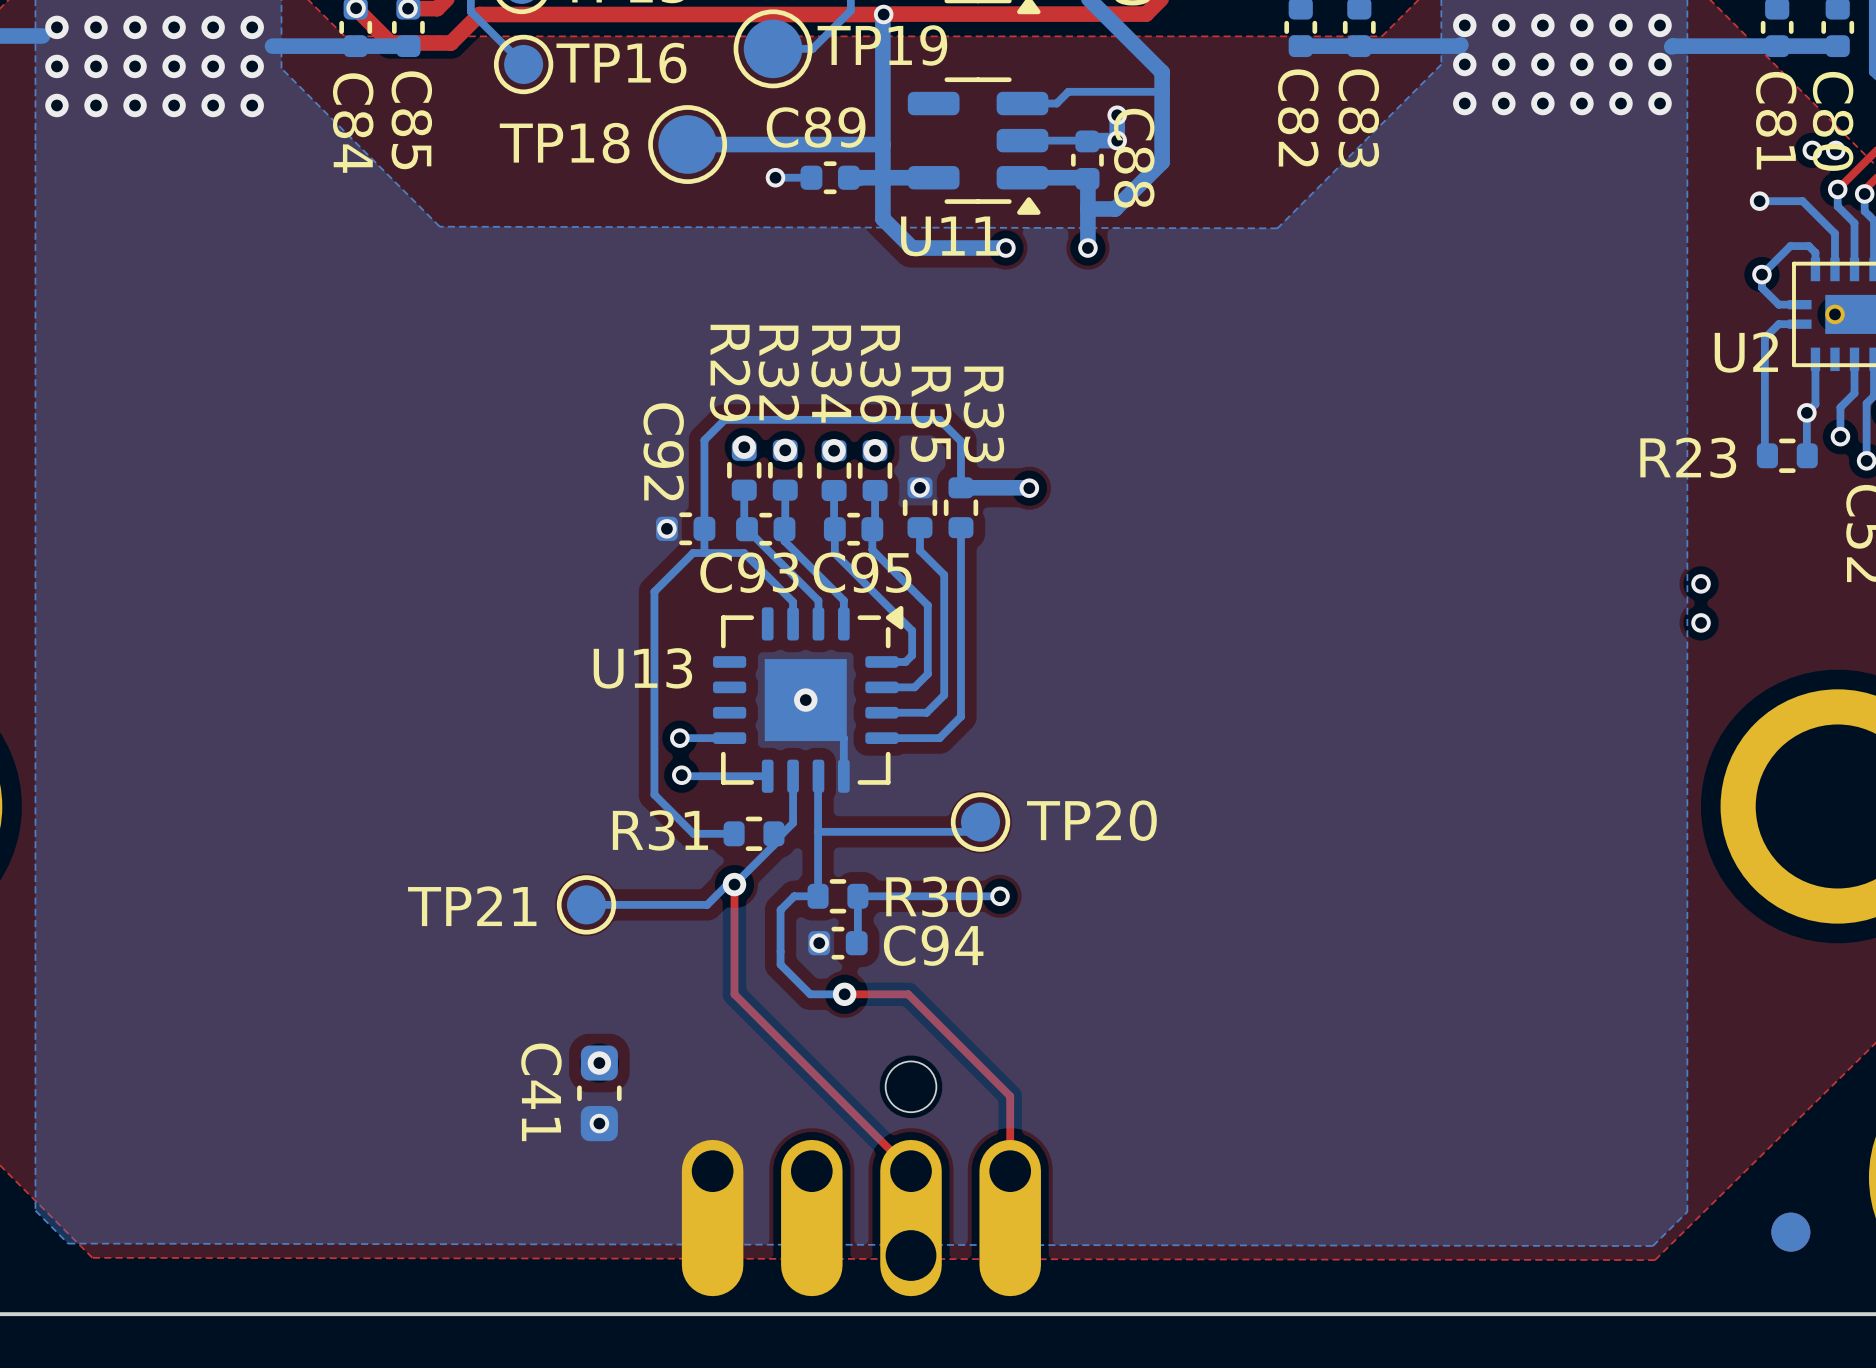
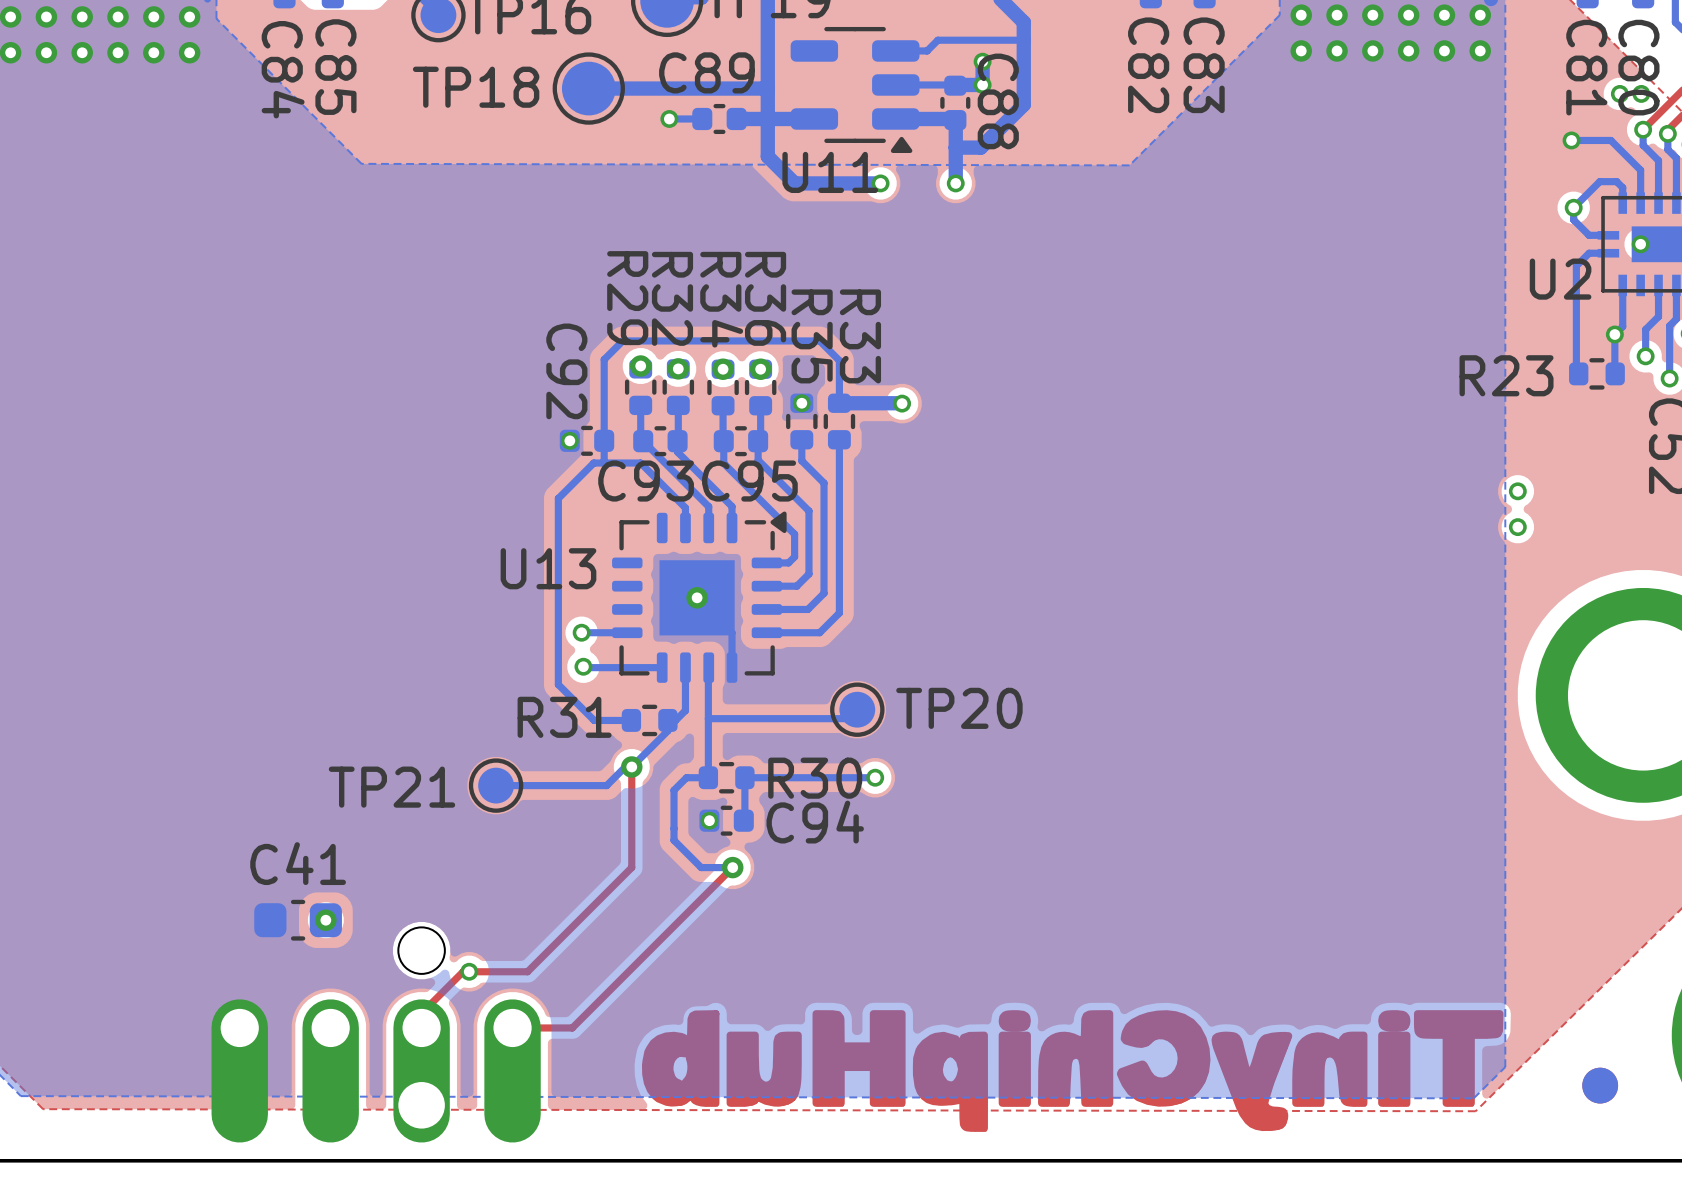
top track: (734, 994) (911, 1170) -> (631, 867) (527, 971) (463, 971) (421, 1013) (421, 1027)
top track: (844, 994) (908, 994) (1010, 1096) (1010, 1171) -> (732, 867) (572, 1027) (512, 1027)
via position: (599, 1063) -> (325, 920)
C41 rotation: 0° (599, 1093) -> 90° clockwise (298, 920)
C41 position: (599, 1093) -> (298, 920)
via position: (599, 1123) -> (469, 971)
drawing: none -> [641, 1010, 1504, 1132]
part position: (861, 1178) -> (376, 1034)

